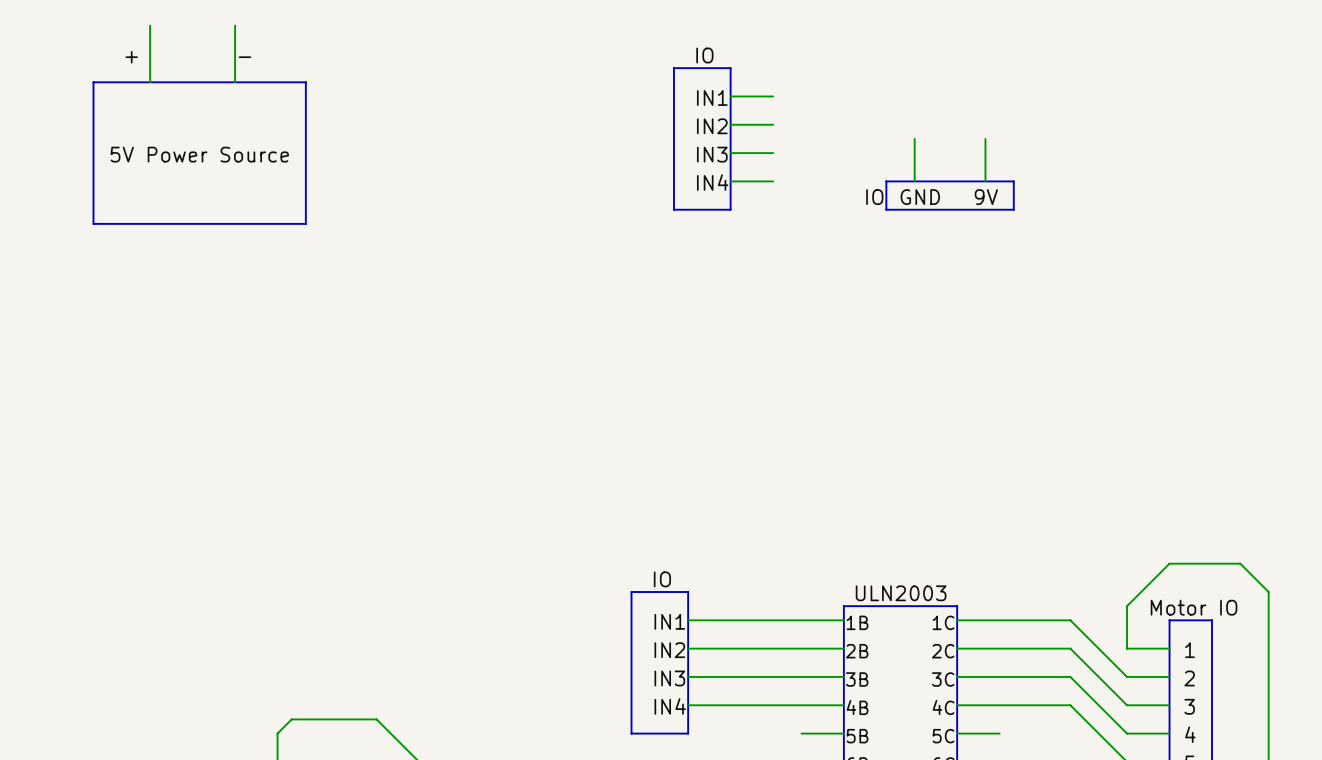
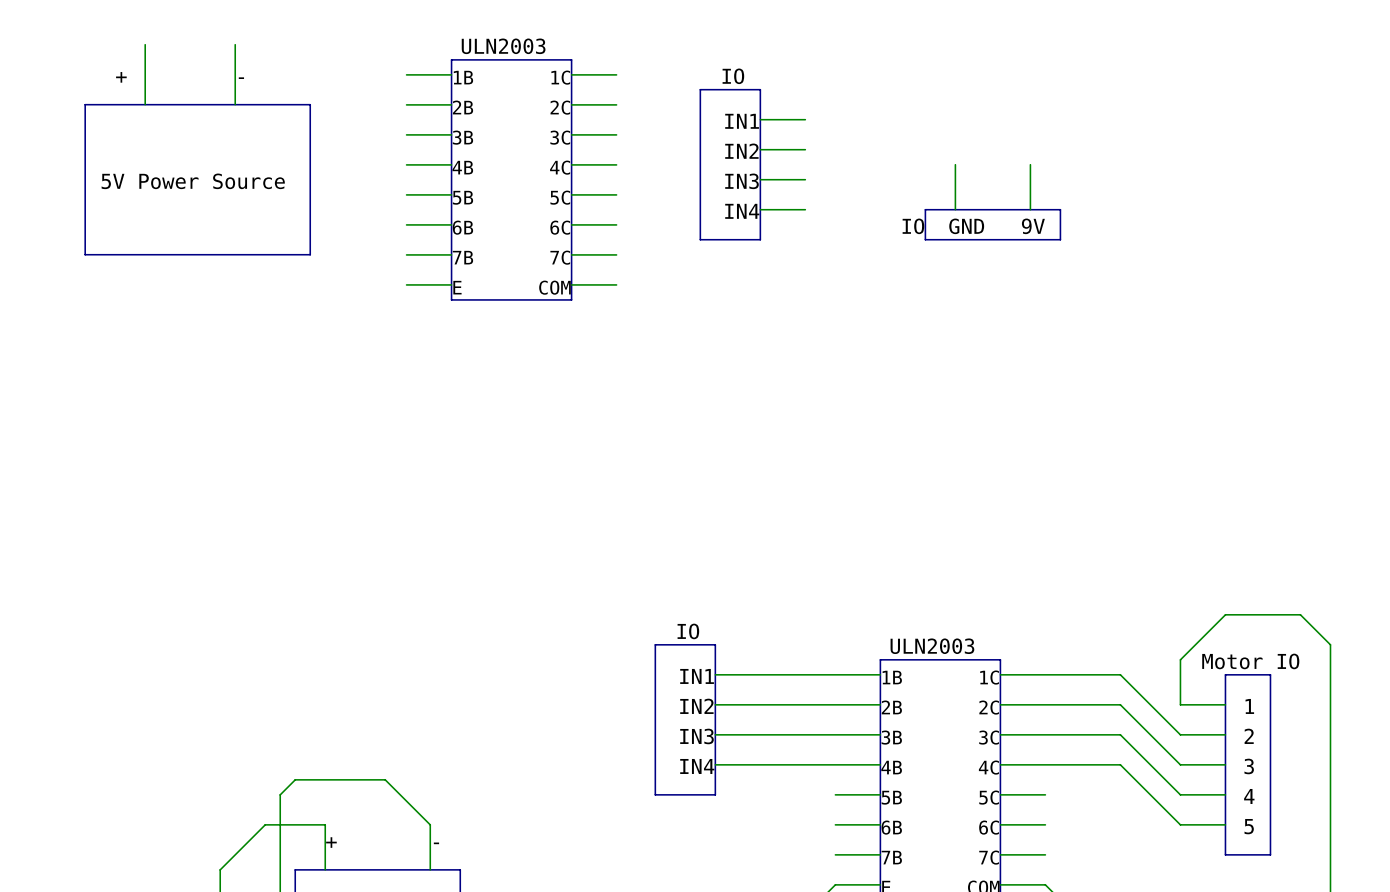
label: none -> ULN2003 (503, 46)
line: none -> (451, 59) (571, 59) (571, 299) (451, 299) (451, 59)
wire: none -> (406, 74) (451, 74)
wire: none -> (571, 74) (616, 74)
label: none -> 1B (463, 77)
label: none -> 1C (560, 77)
wire: none -> (406, 104) (451, 104)
wire: none -> (571, 104) (616, 104)
label: none -> 2B (463, 107)
label: none -> 2C (560, 107)
wire: none -> (406, 134) (451, 134)
wire: none -> (571, 134) (616, 134)
label: none -> 3B (462, 137)
label: none -> 3C (560, 137)
wire: none -> (406, 164) (451, 164)
wire: none -> (571, 164) (616, 164)
label: none -> 4B (462, 167)
label: none -> 4C (560, 167)
wire: none -> (406, 194) (451, 194)
wire: none -> (571, 194) (616, 194)
label: none -> 5B (462, 197)
label: none -> 5C (560, 197)
wire: none -> (406, 224) (451, 224)
wire: none -> (571, 224) (616, 224)
label: none -> 6B (462, 227)
label: none -> 6C (560, 227)
wire: none -> (406, 254) (451, 254)
wire: none -> (571, 254) (616, 254)
label: none -> 7B (462, 257)
label: none -> 7C (560, 257)
wire: none -> (406, 284) (451, 284)
wire: none -> (571, 284) (616, 284)
label: none -> E (457, 287)
label: none -> COM (554, 287)

